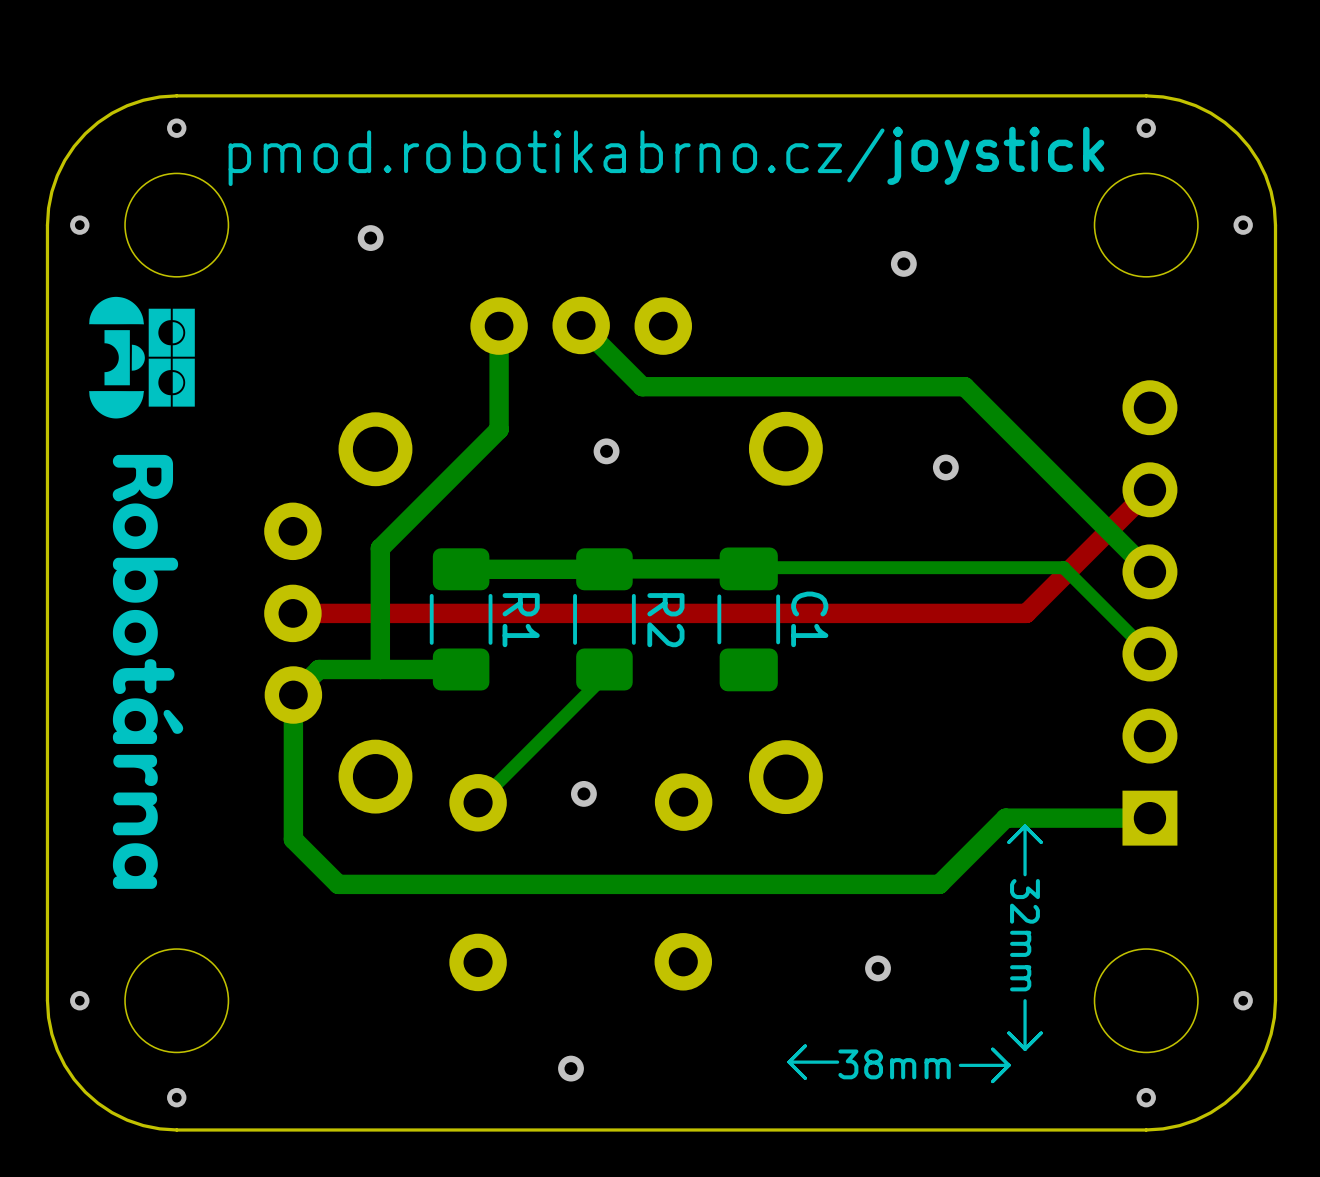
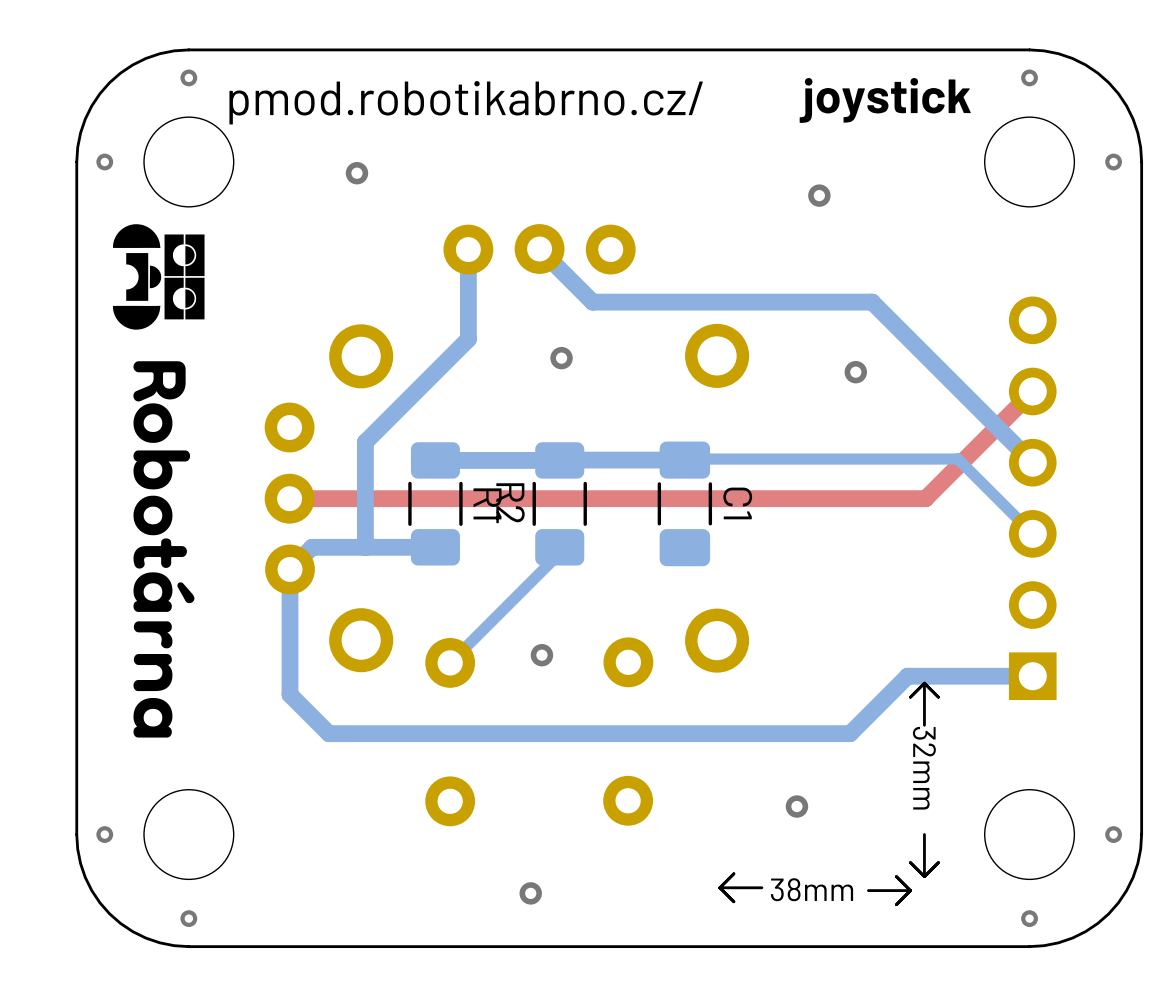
R2 name position: R2 (665, 620) -> R2 (510, 503)

